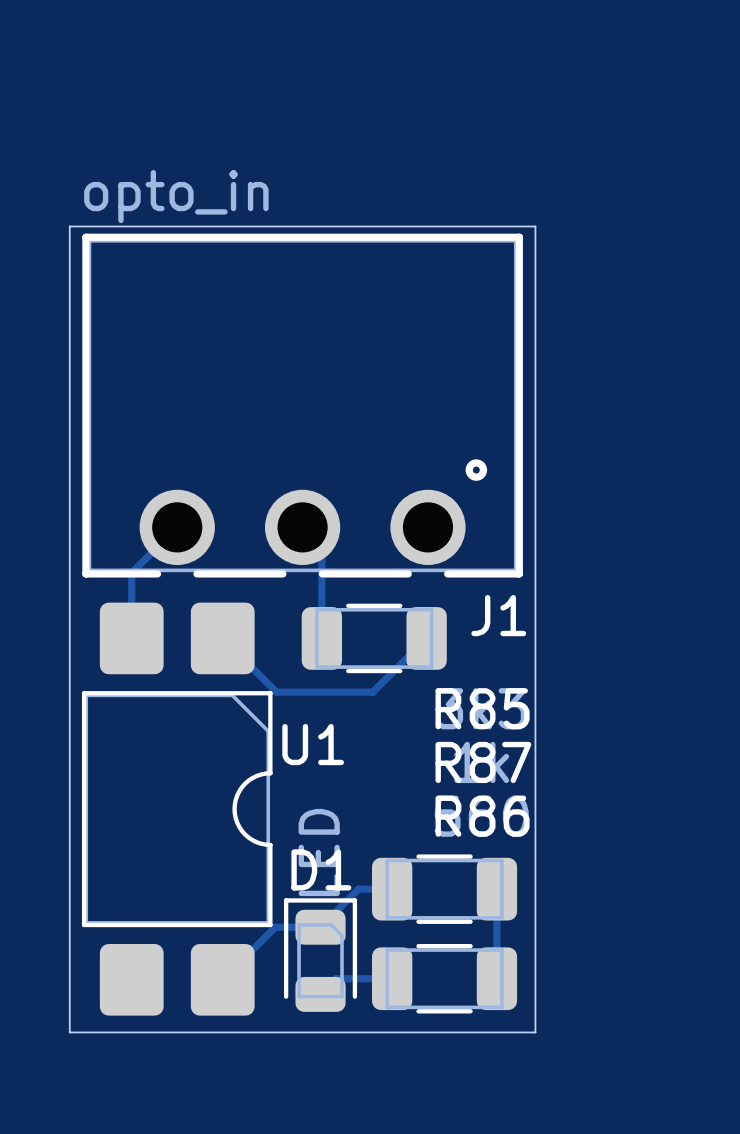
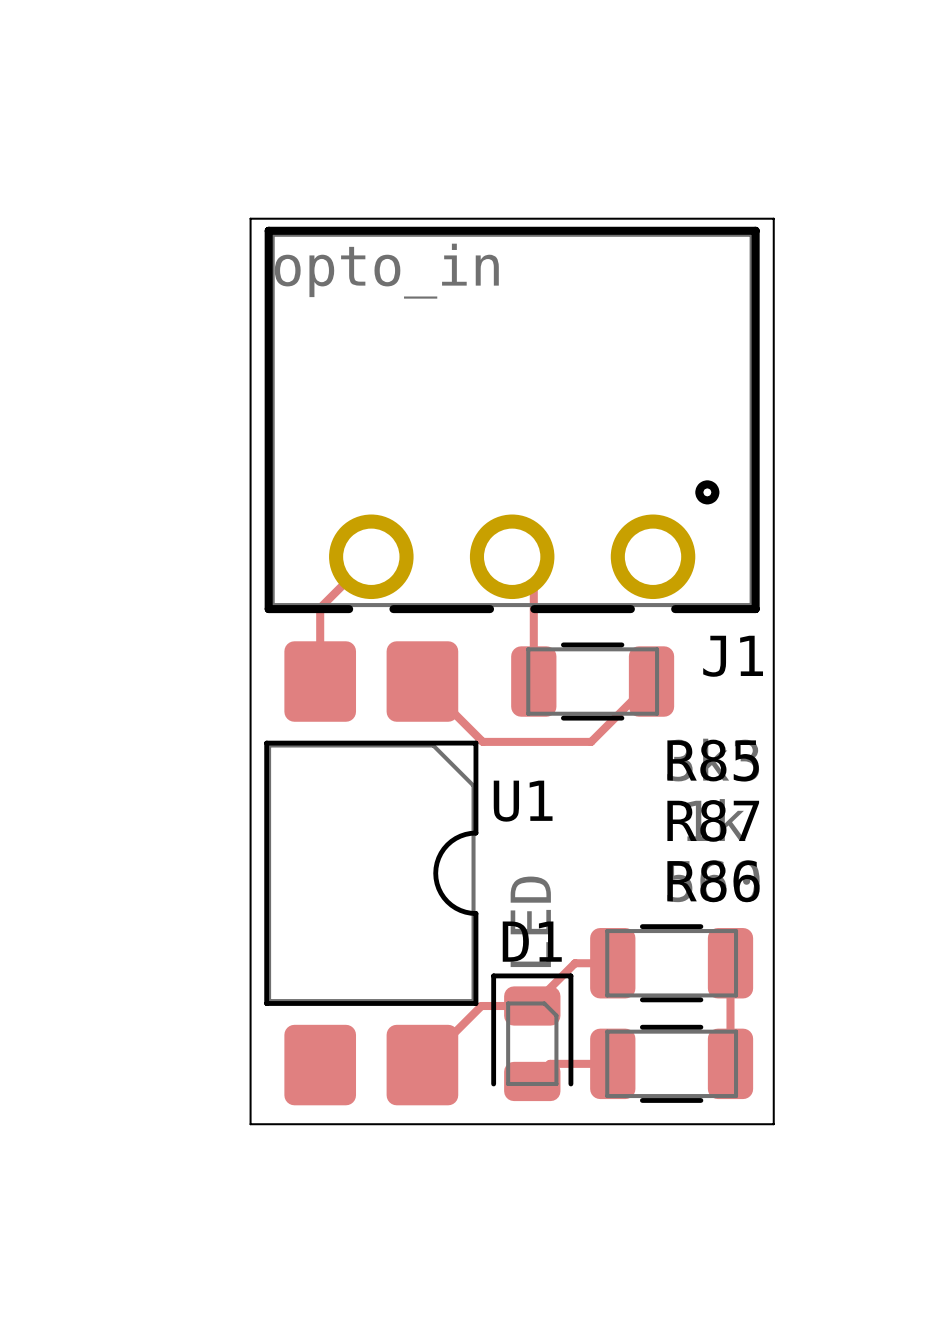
J1 value position: opto_in (176, 196) -> opto_in (386, 271)

